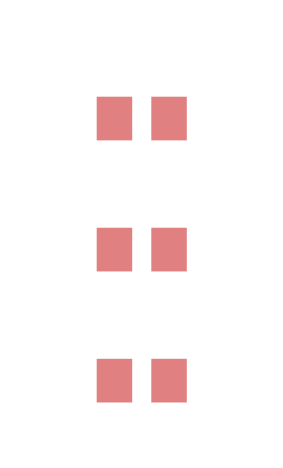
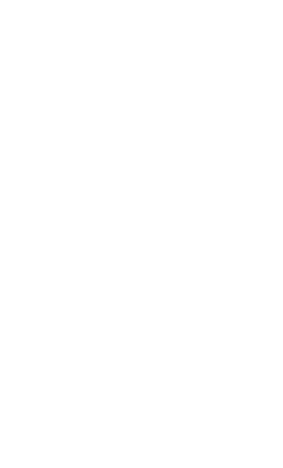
part: (141, 118) -> none
part: (141, 249) -> none
part: (141, 380) -> none

